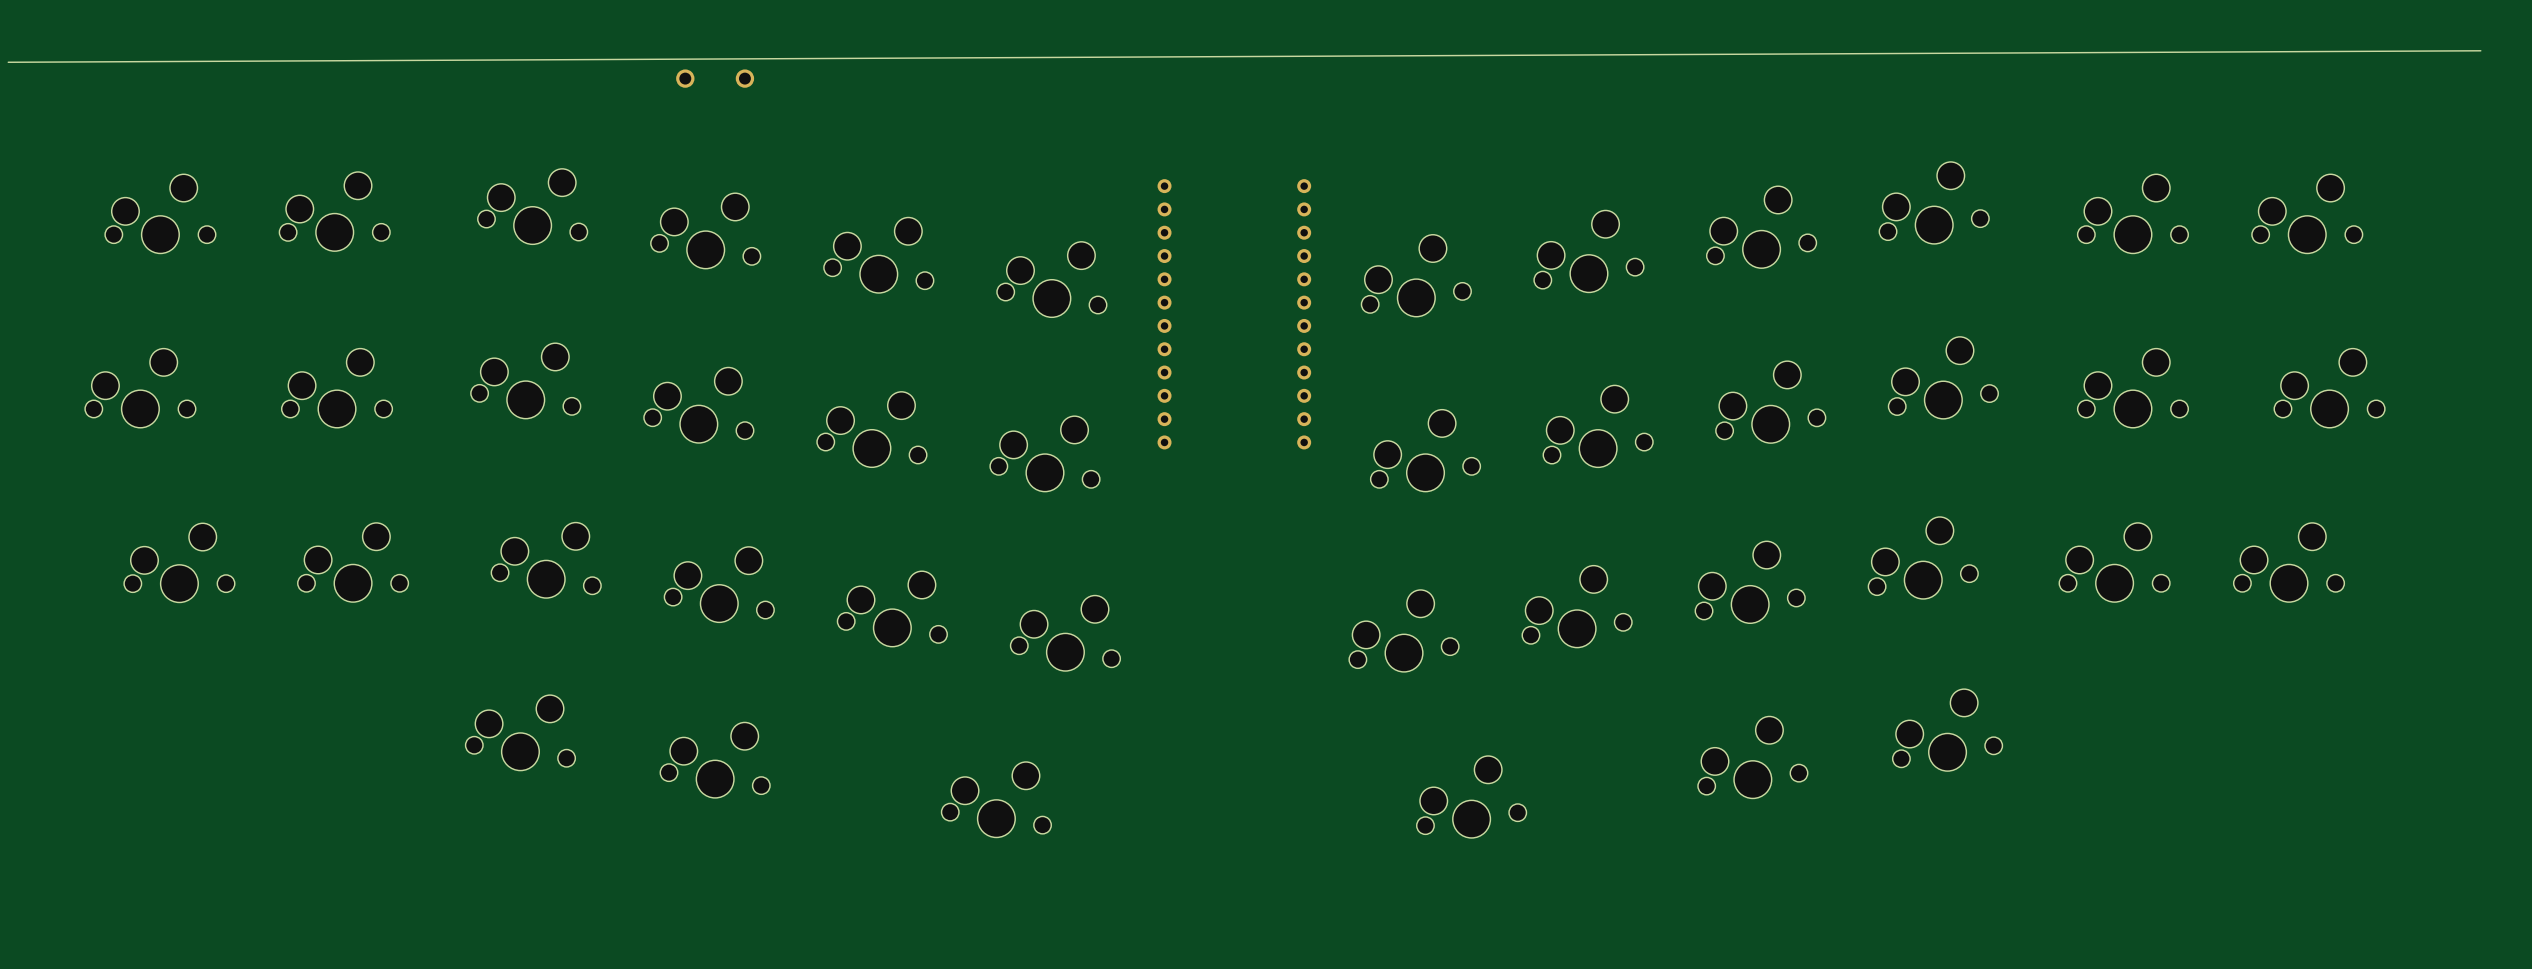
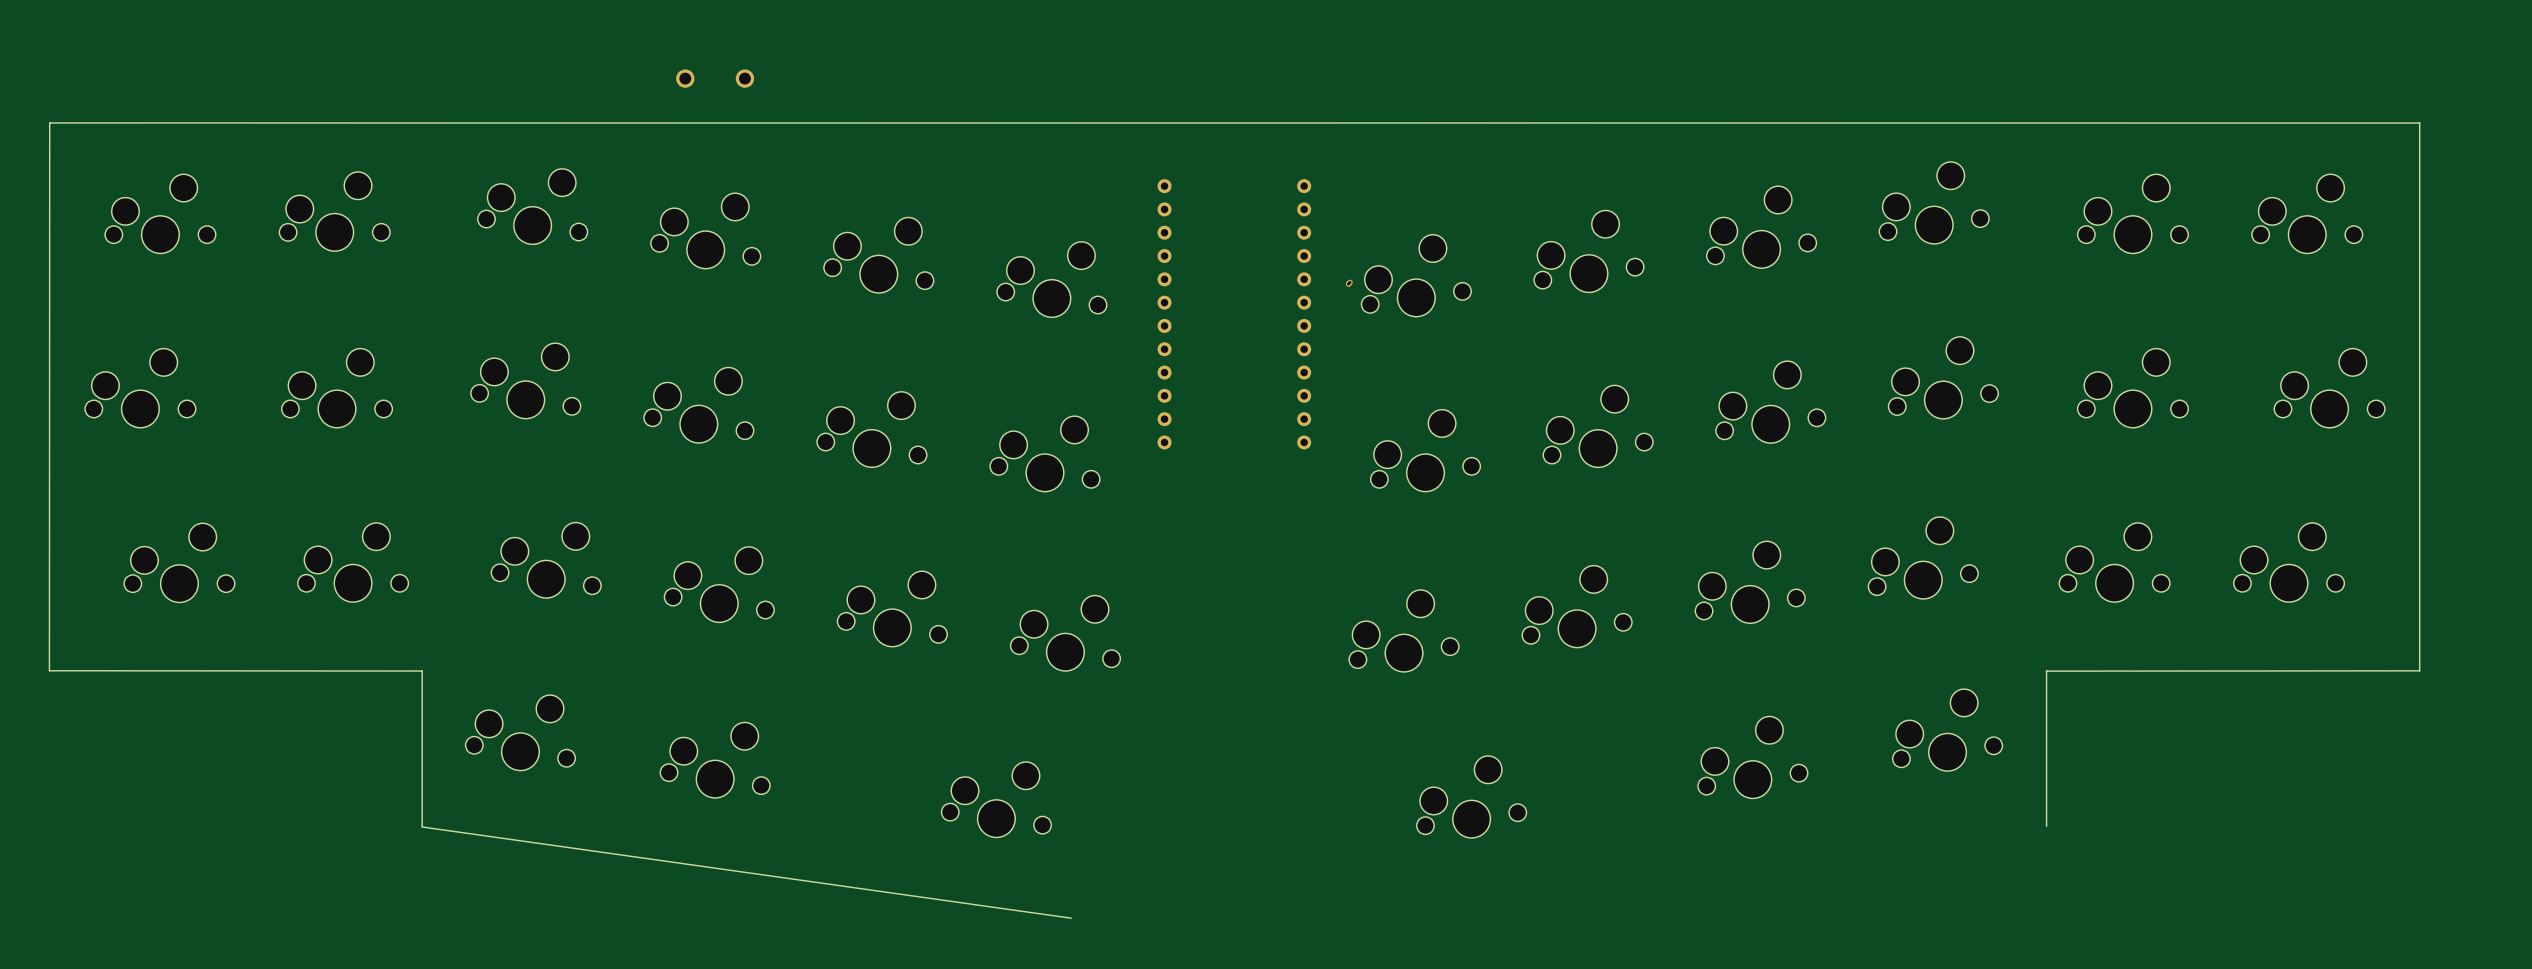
board edge: (2480, 50) (8, 62) -> none
via: none -> (1350, 282)
via: none -> (1348, 283)
board edge: none -> (2046, 670) (2046, 826)
board edge: none -> (422, 671) (422, 826)
board edge: none -> (2046, 671) (2419, 670) (2419, 123) (49, 122) (49, 670) (422, 671)
board edge: none -> (422, 826) (1071, 918)

